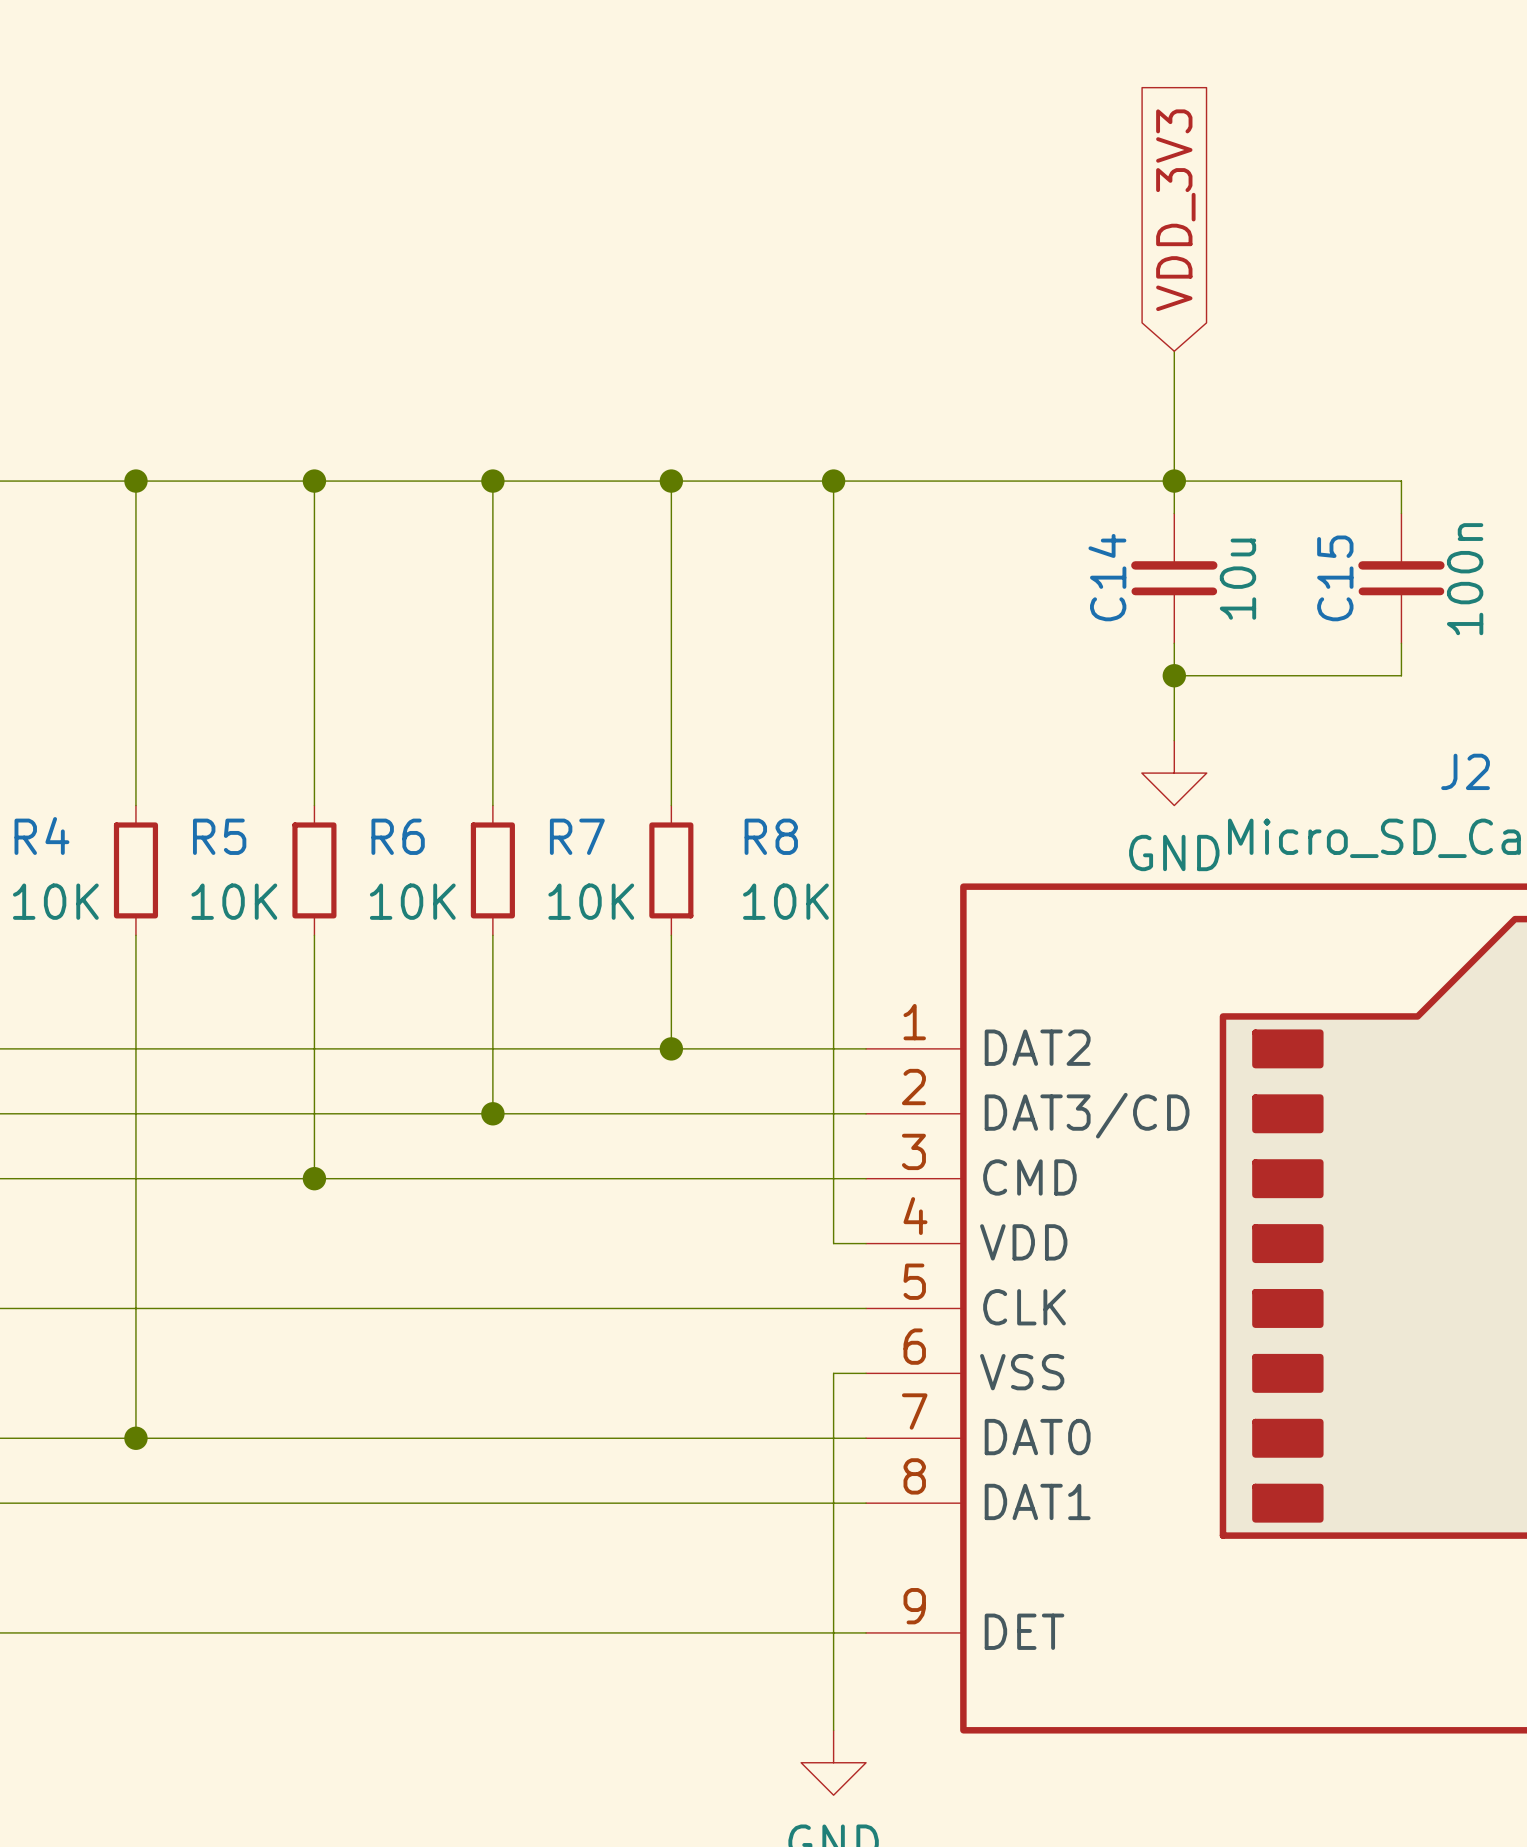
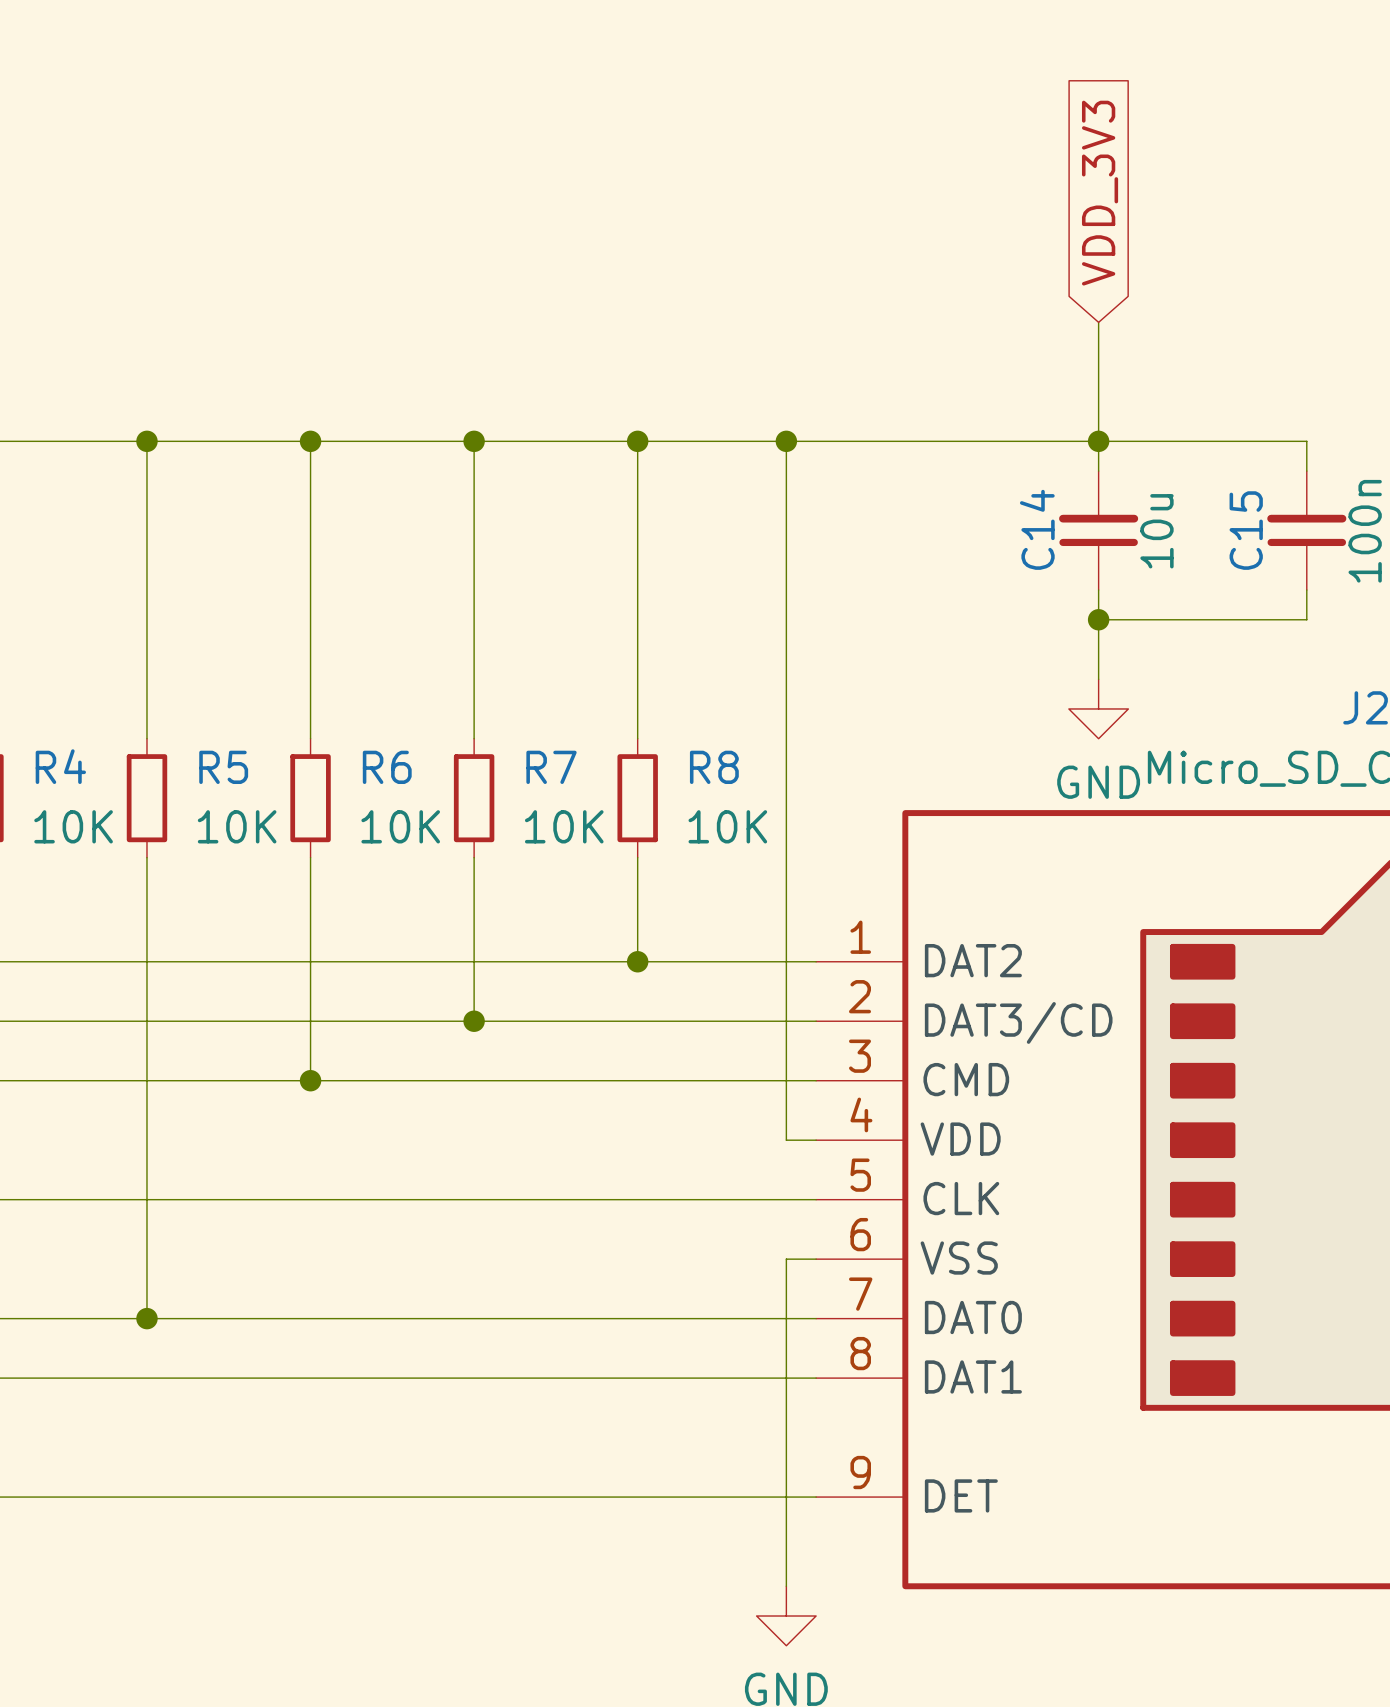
R8 name position: R8 (771, 836) -> R8 (714, 767)
R8 value position: 10K (785, 901) -> 10K (727, 826)

